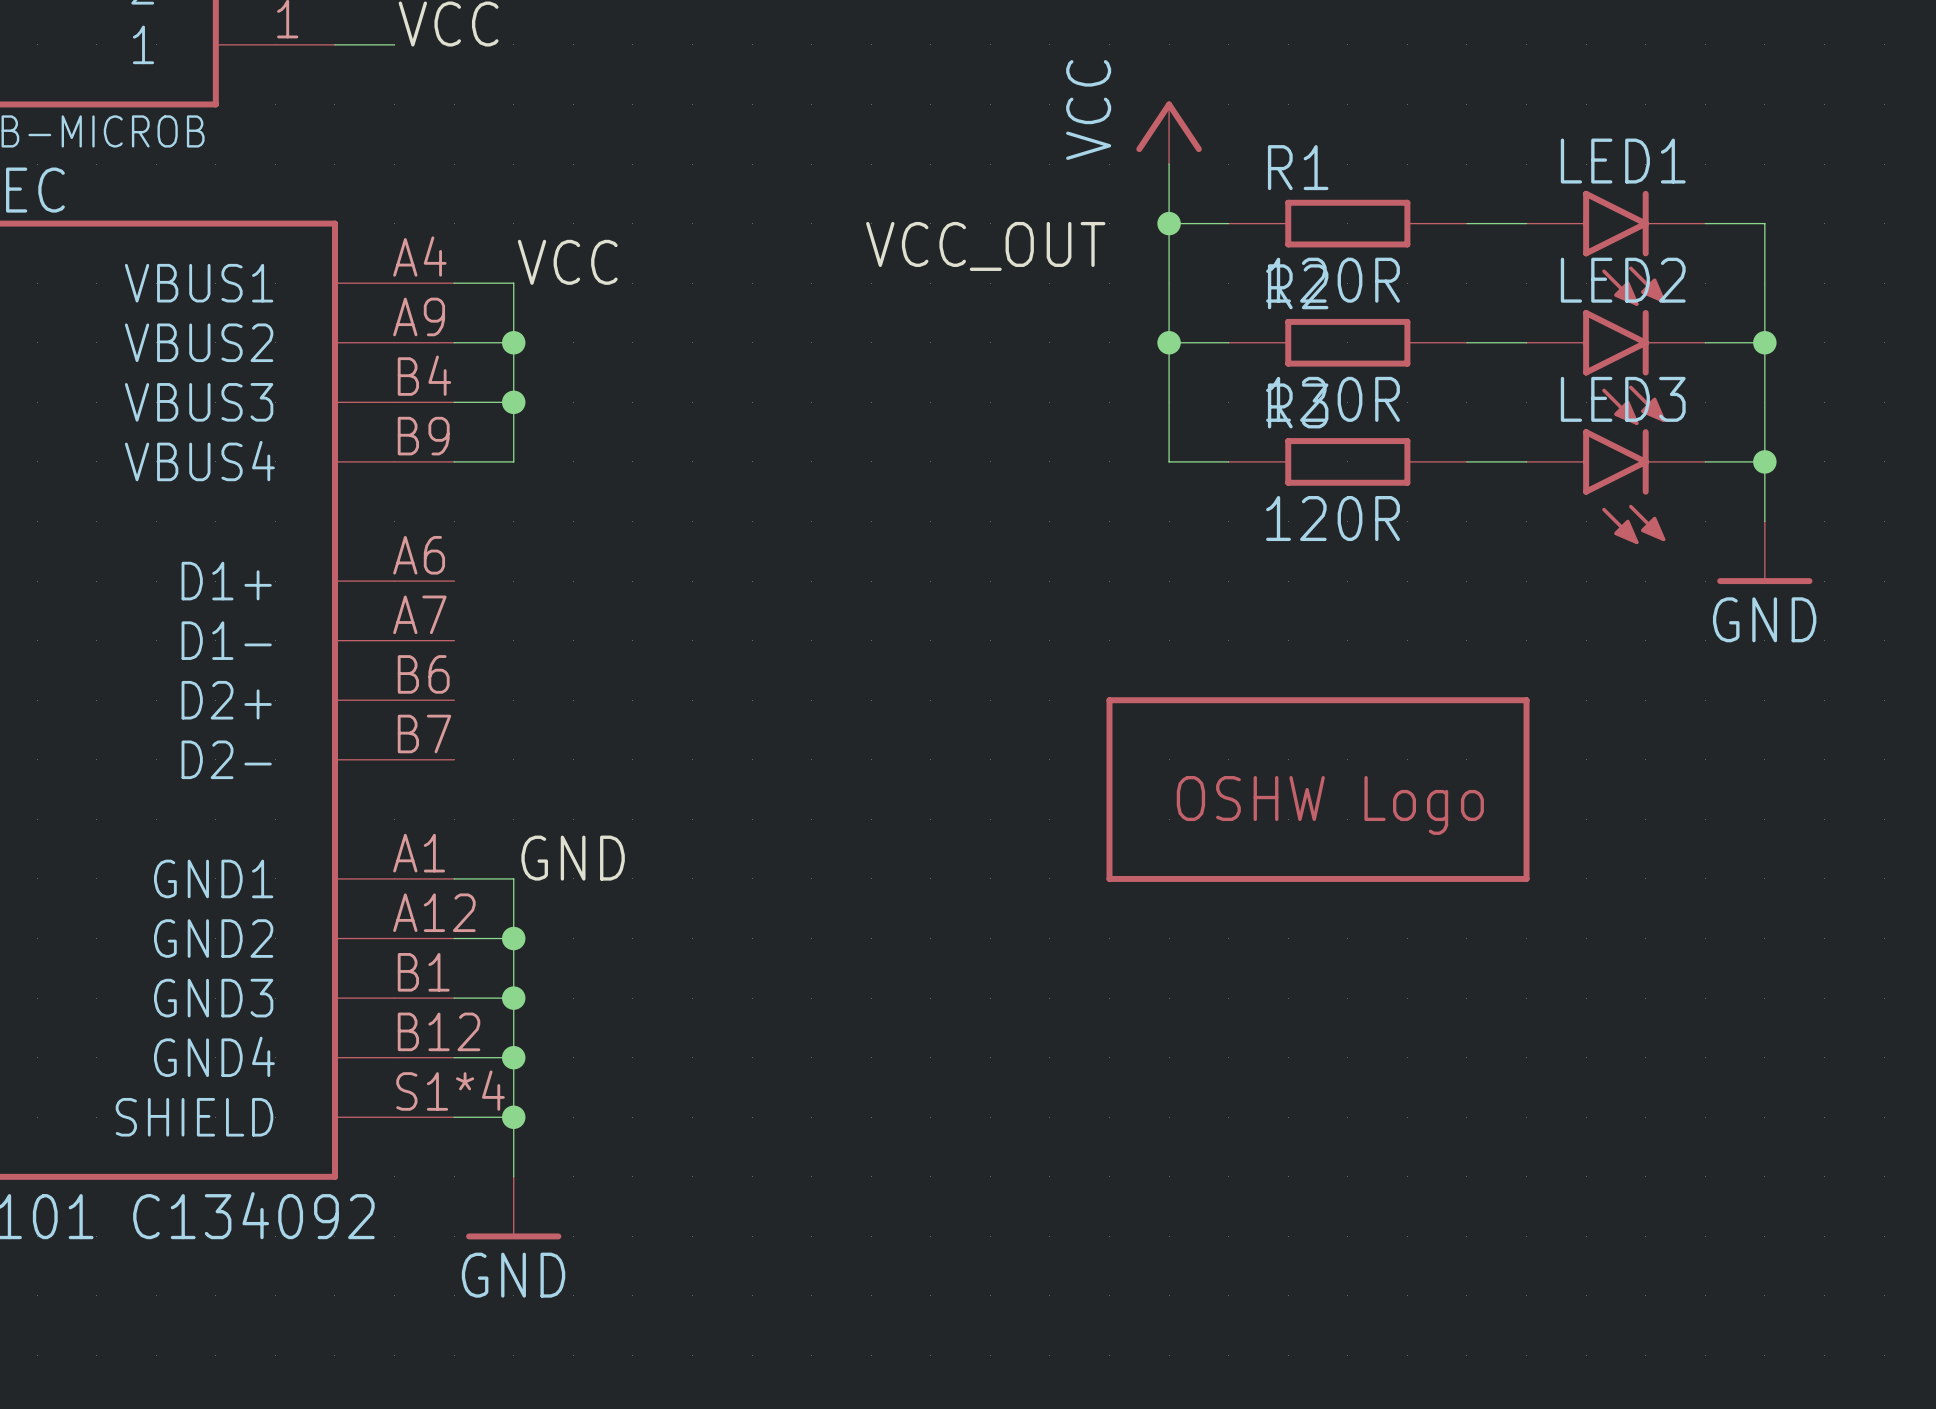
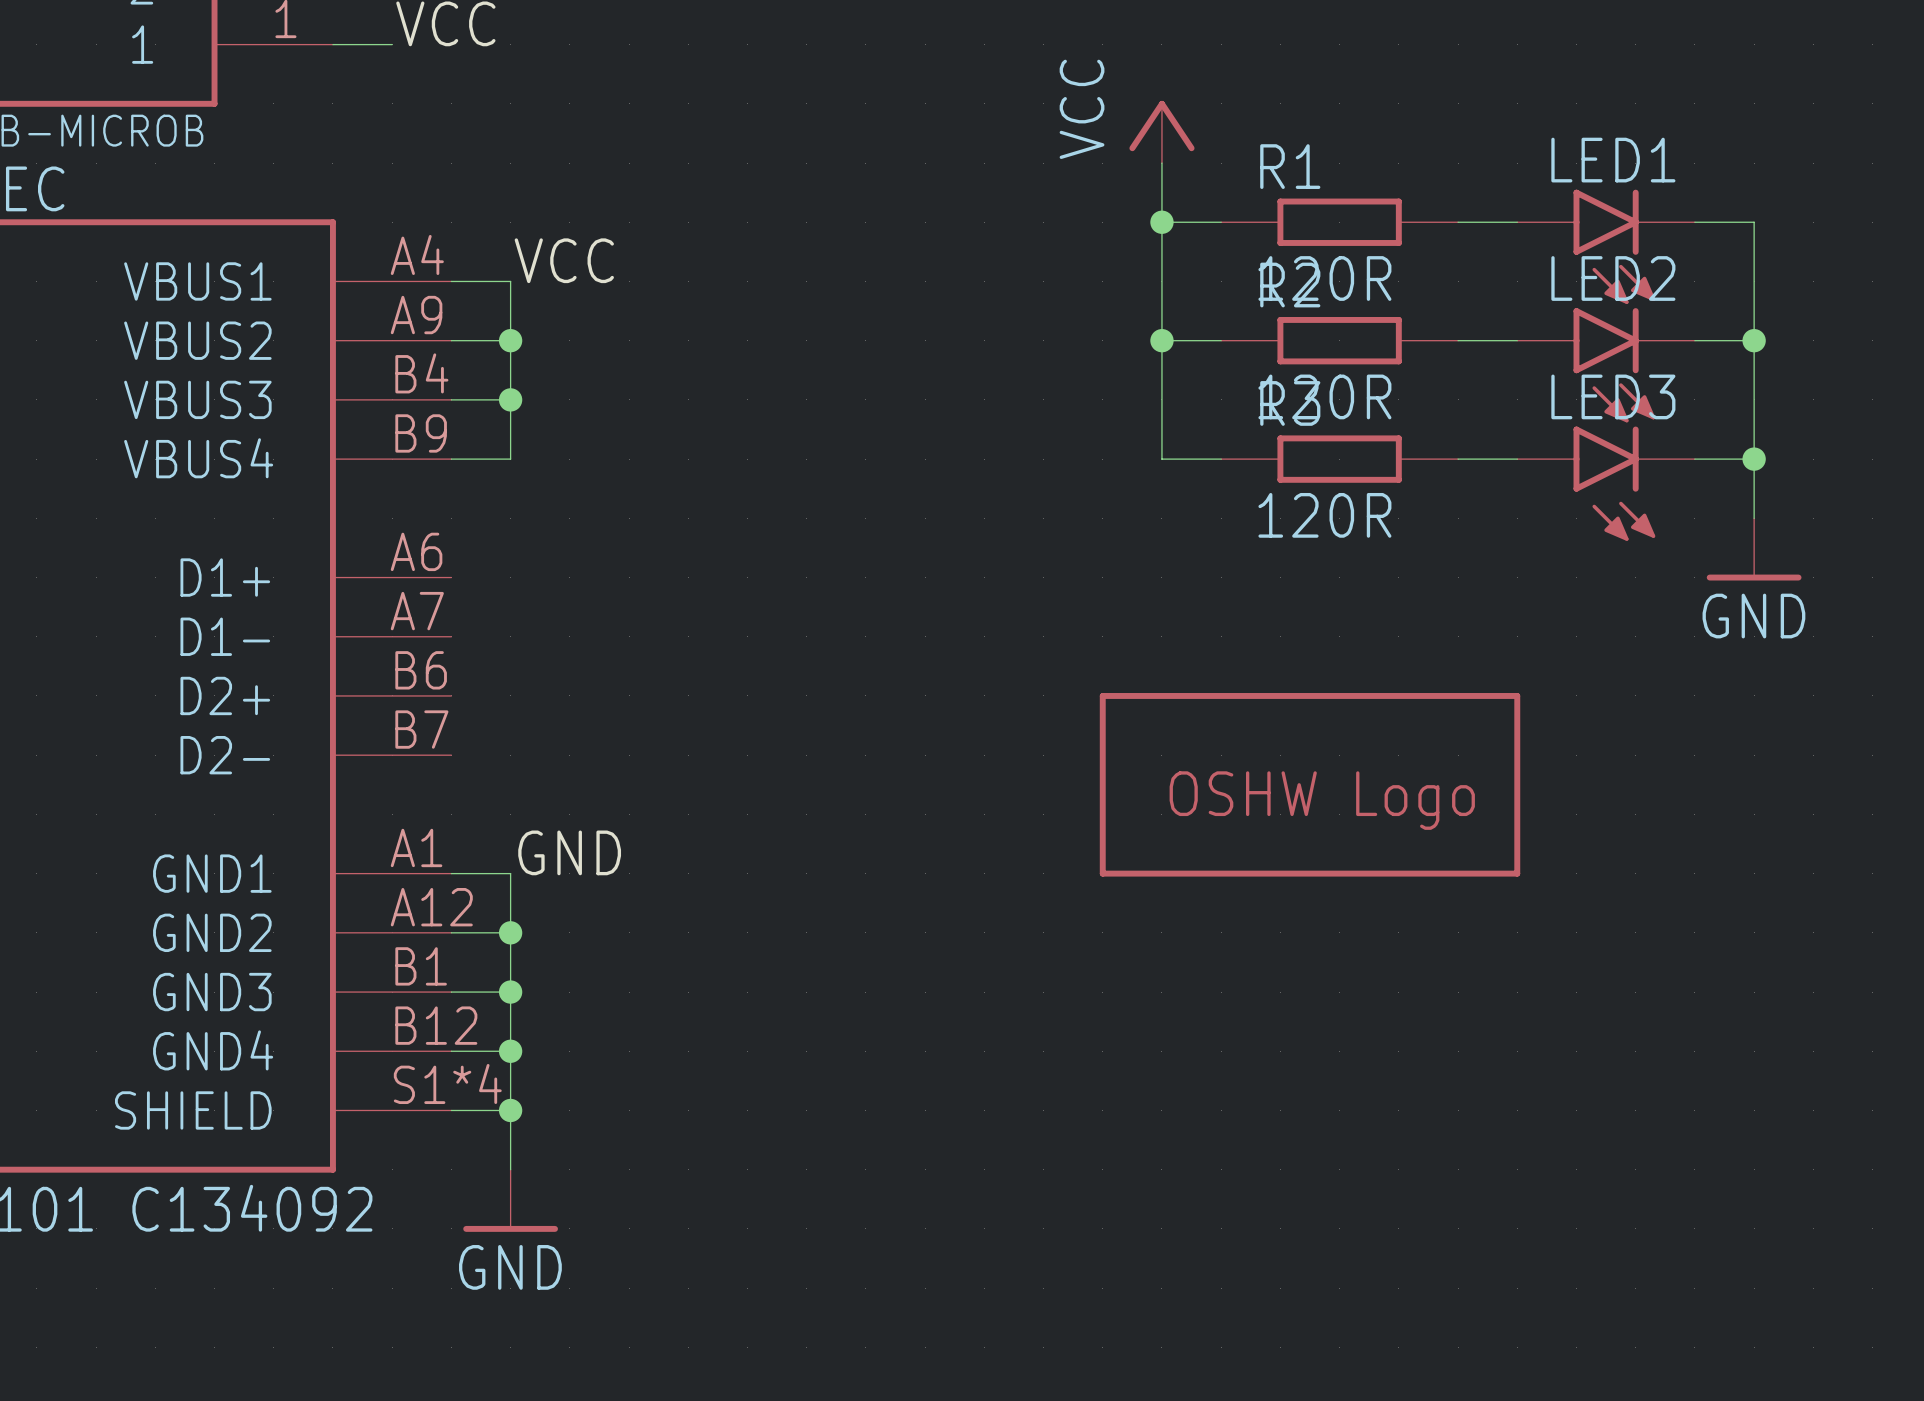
label: VCC_OUT (985, 246) -> none

